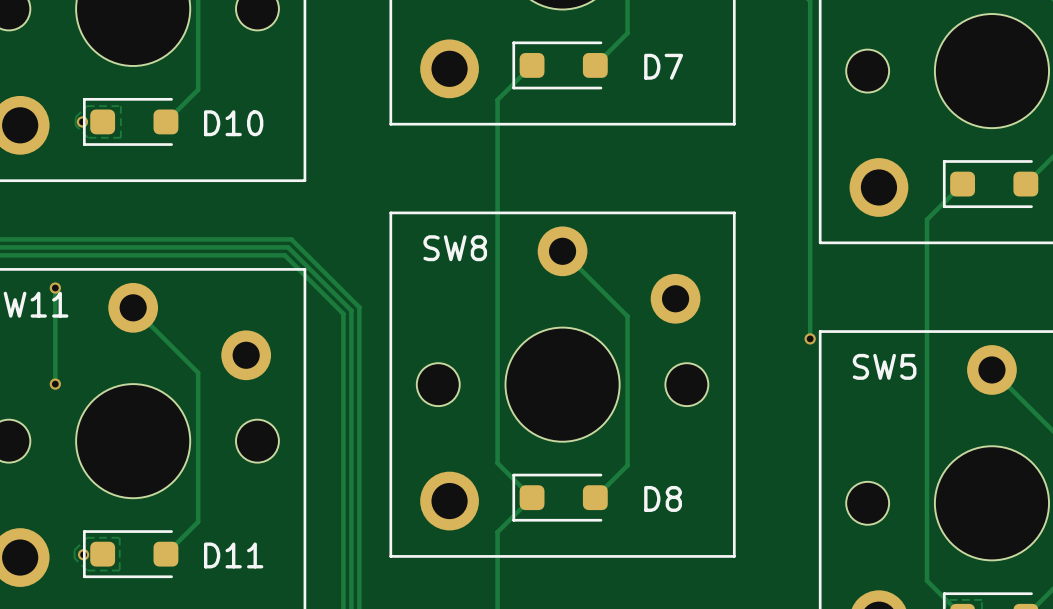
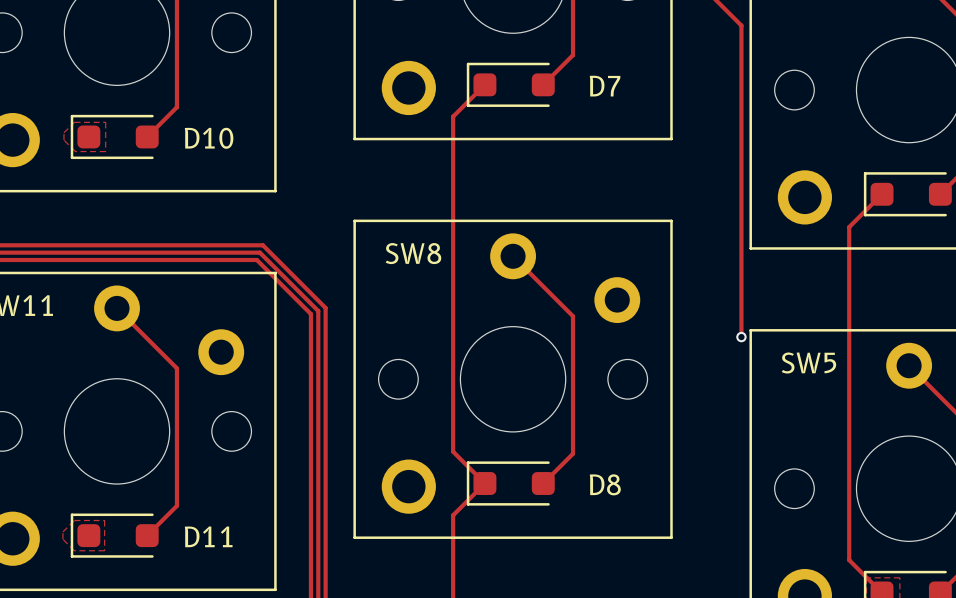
via: (82, 121) -> none
track: (55, 288) (55, 384) -> none
via: (55, 288) -> none
via: (55, 384) -> none
via: (83, 554) -> none

